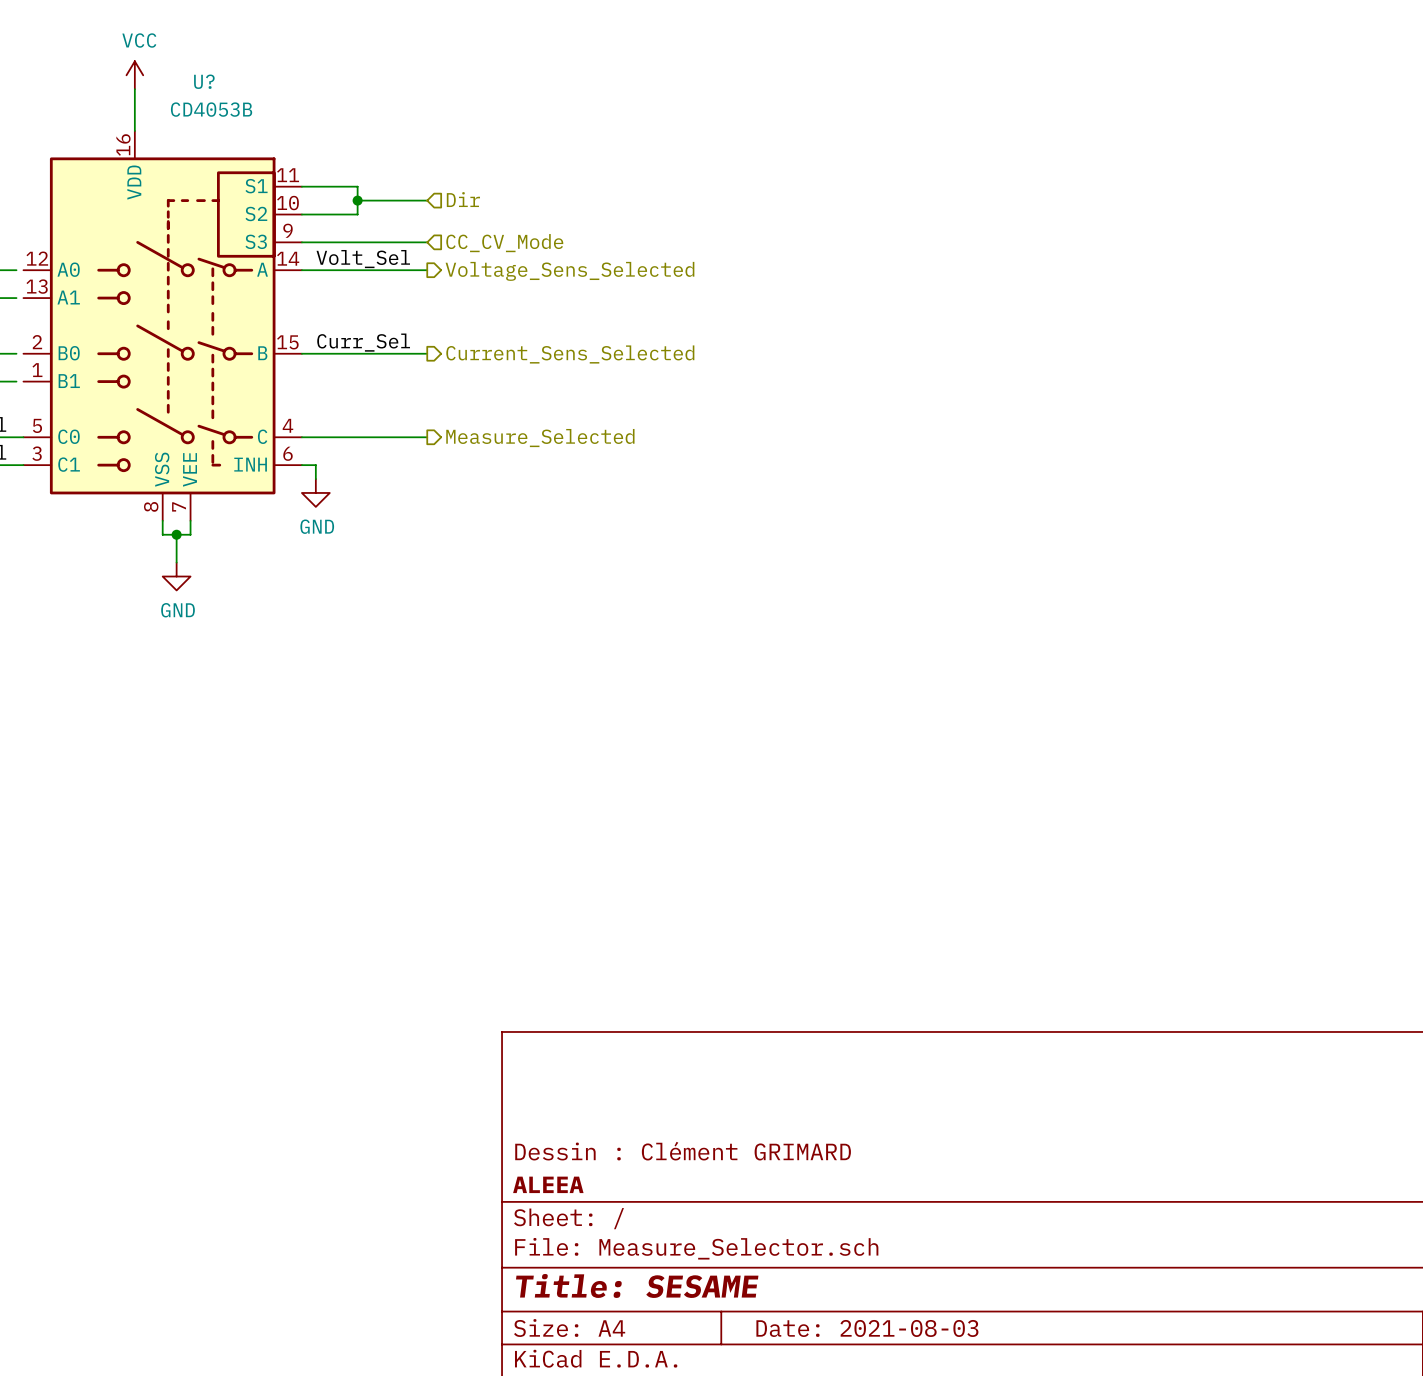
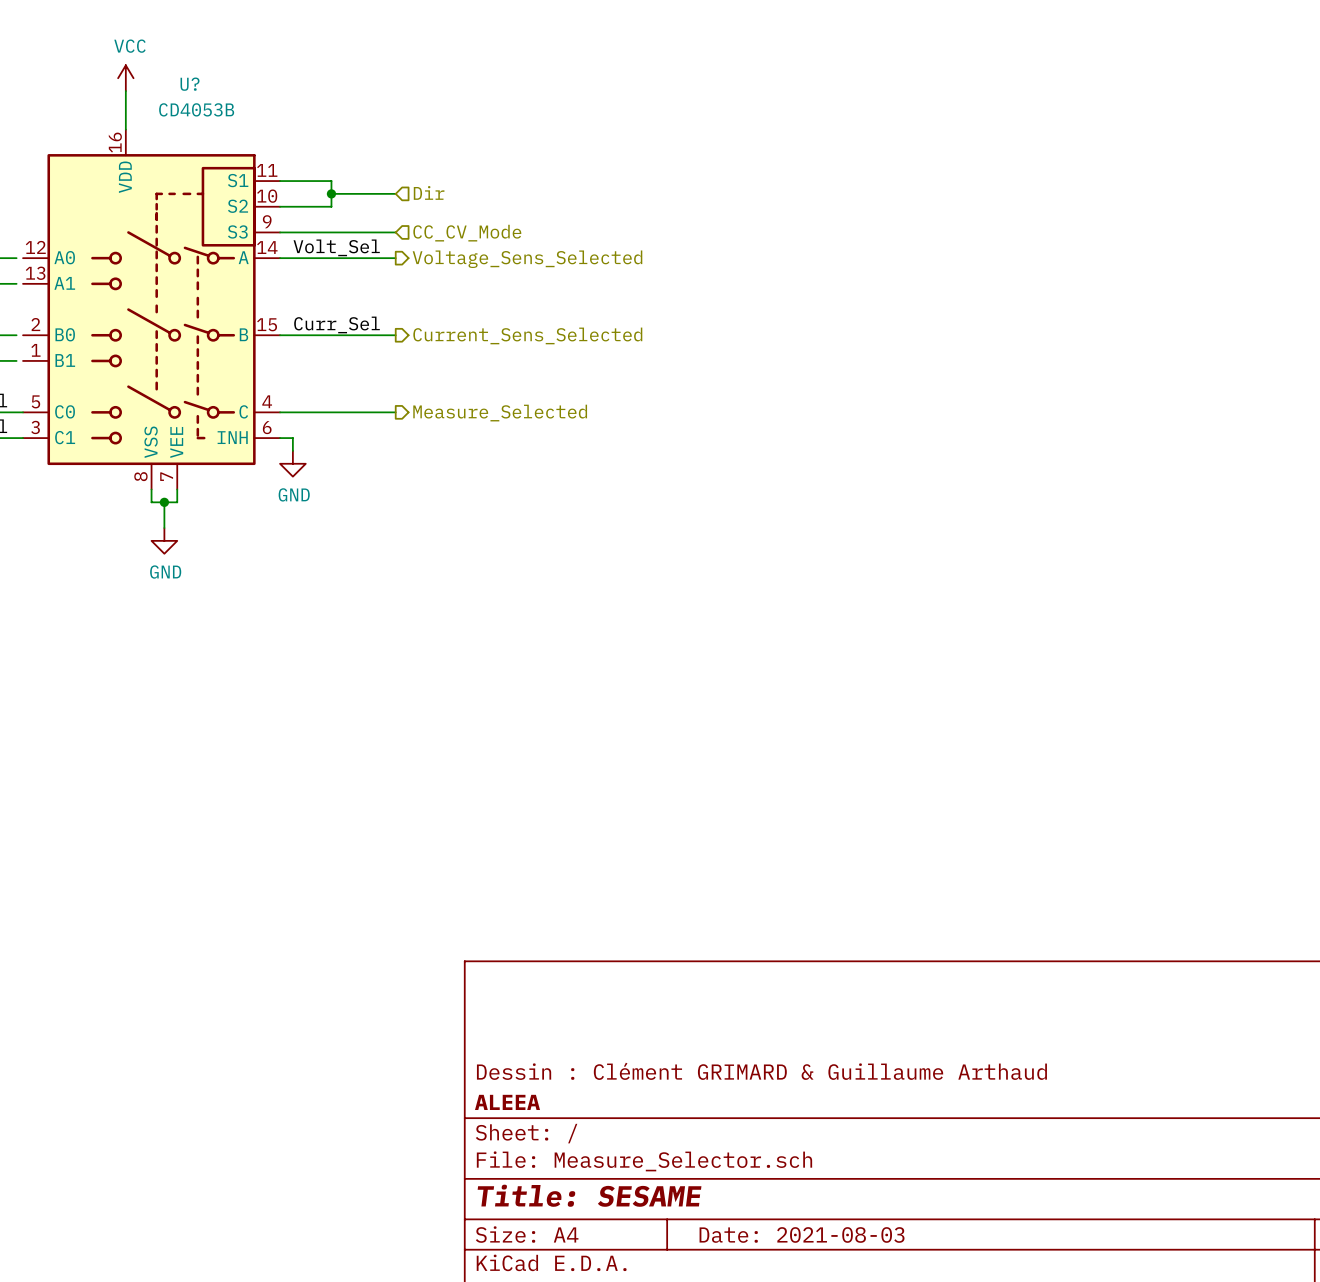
title block: Dessin : Clément GRIMARD (683, 1151) -> Dessin : Clément GRIMARD & Guillaume Arthaud (761, 1071)

